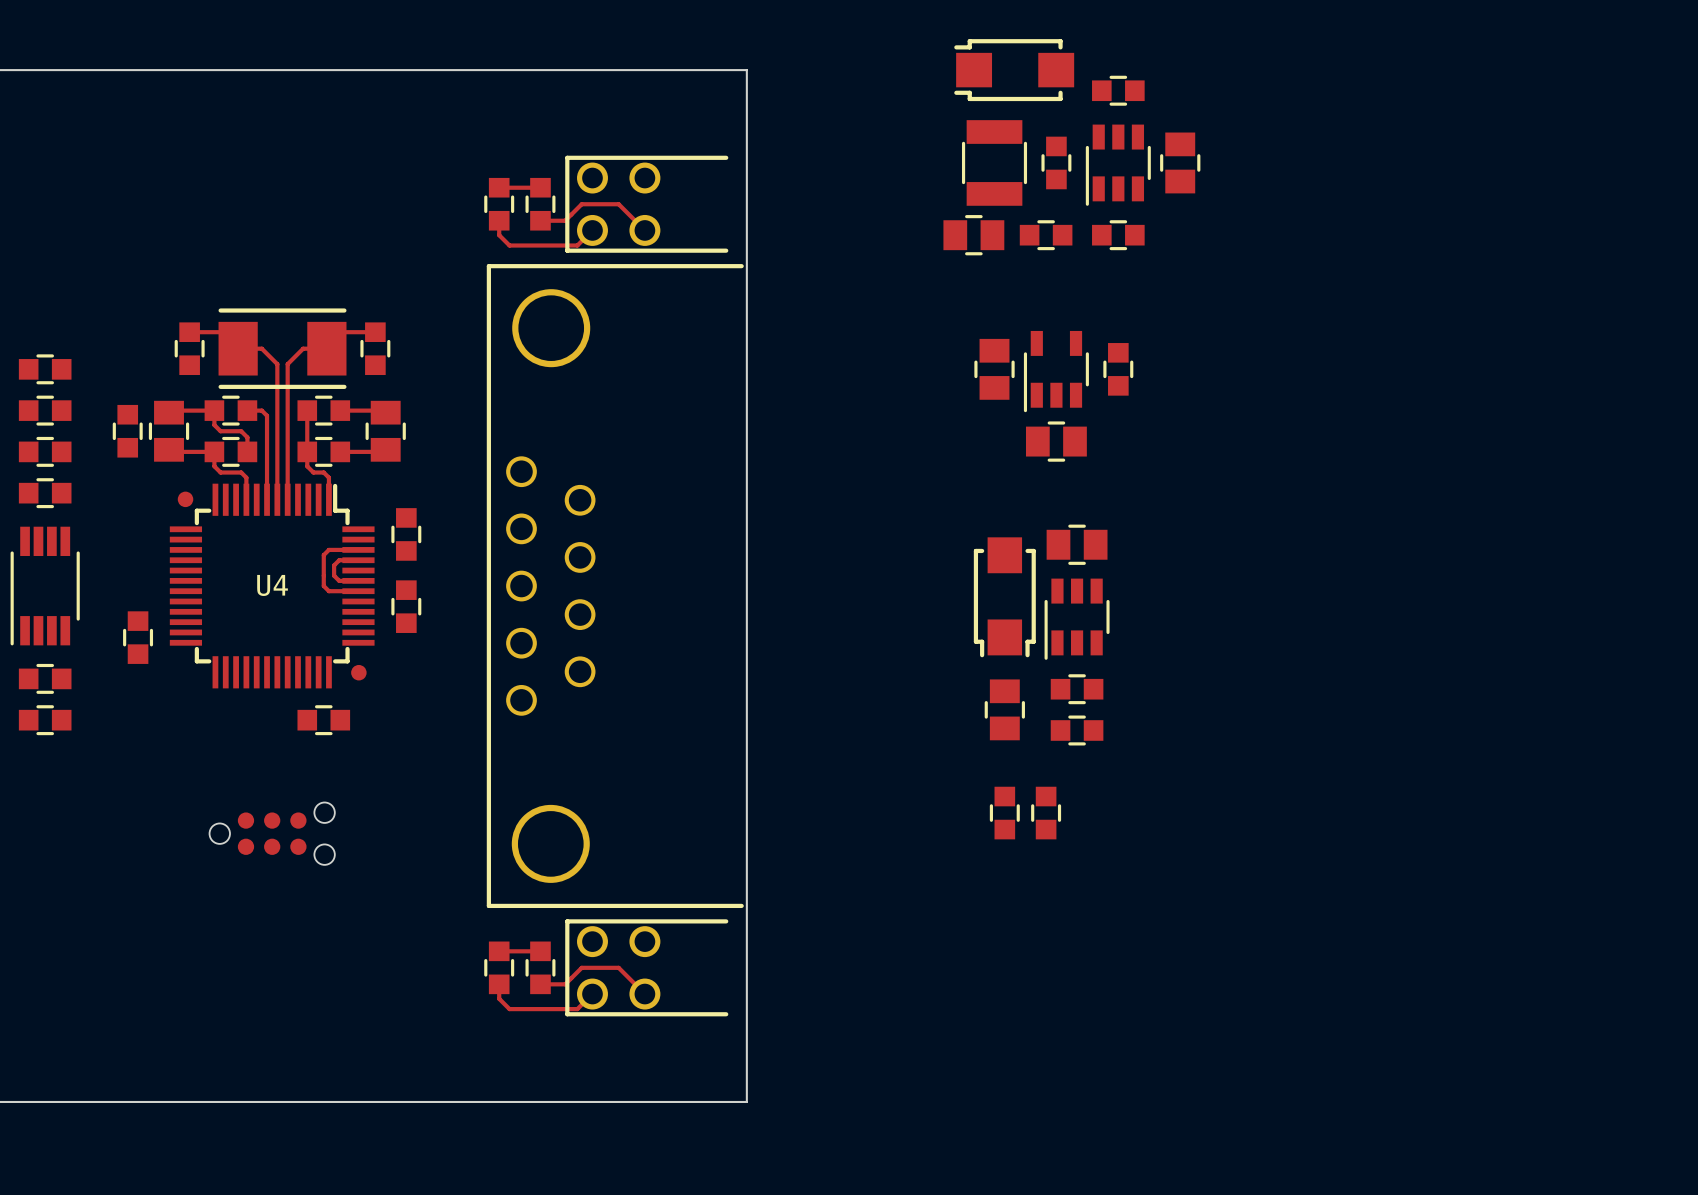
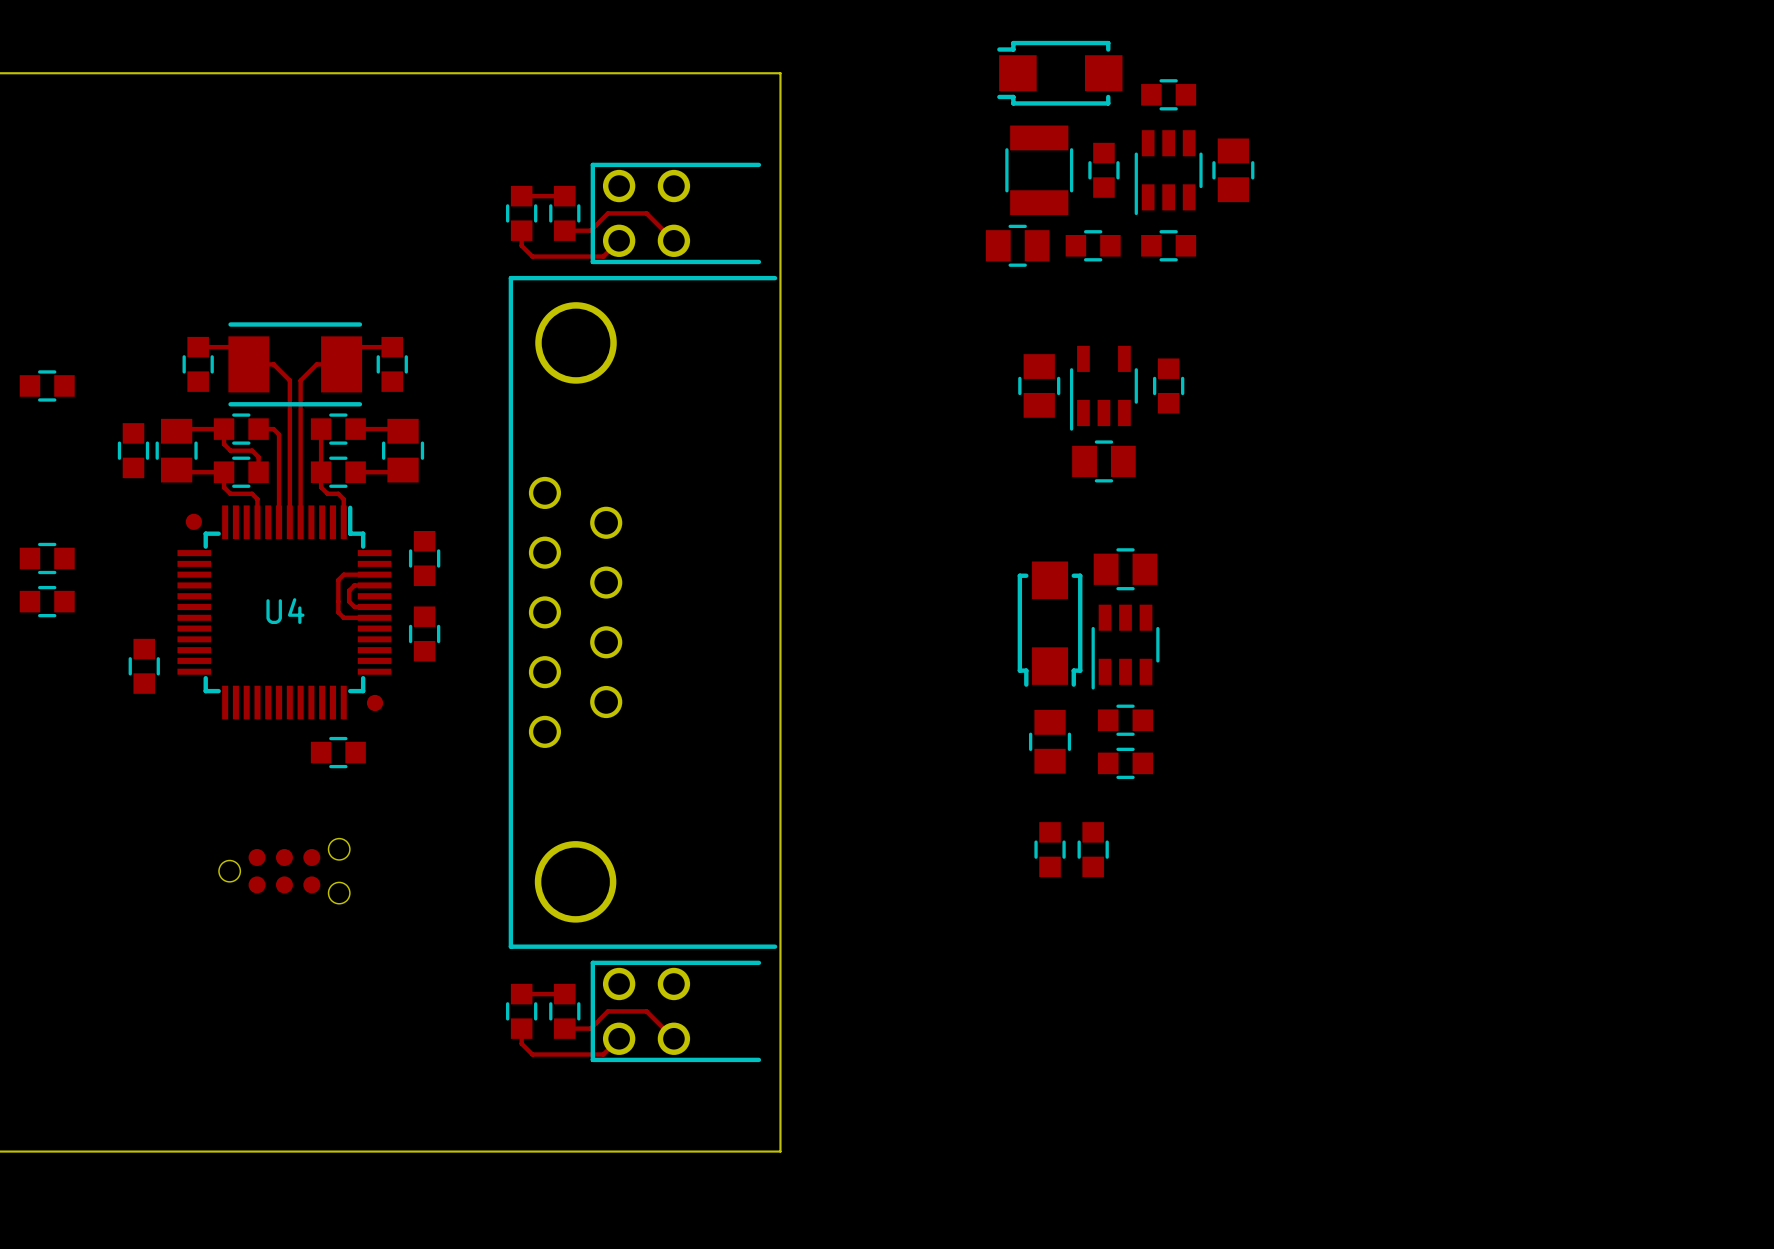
part: (45, 410) -> none
part: (45, 451) -> none
part: (45, 493) -> none
part footprint: [10, 526, 80, 646] -> [19, 585, 75, 618]
part: none -> (47, 558)
part: (45, 678) -> none
part: (45, 720) -> none

